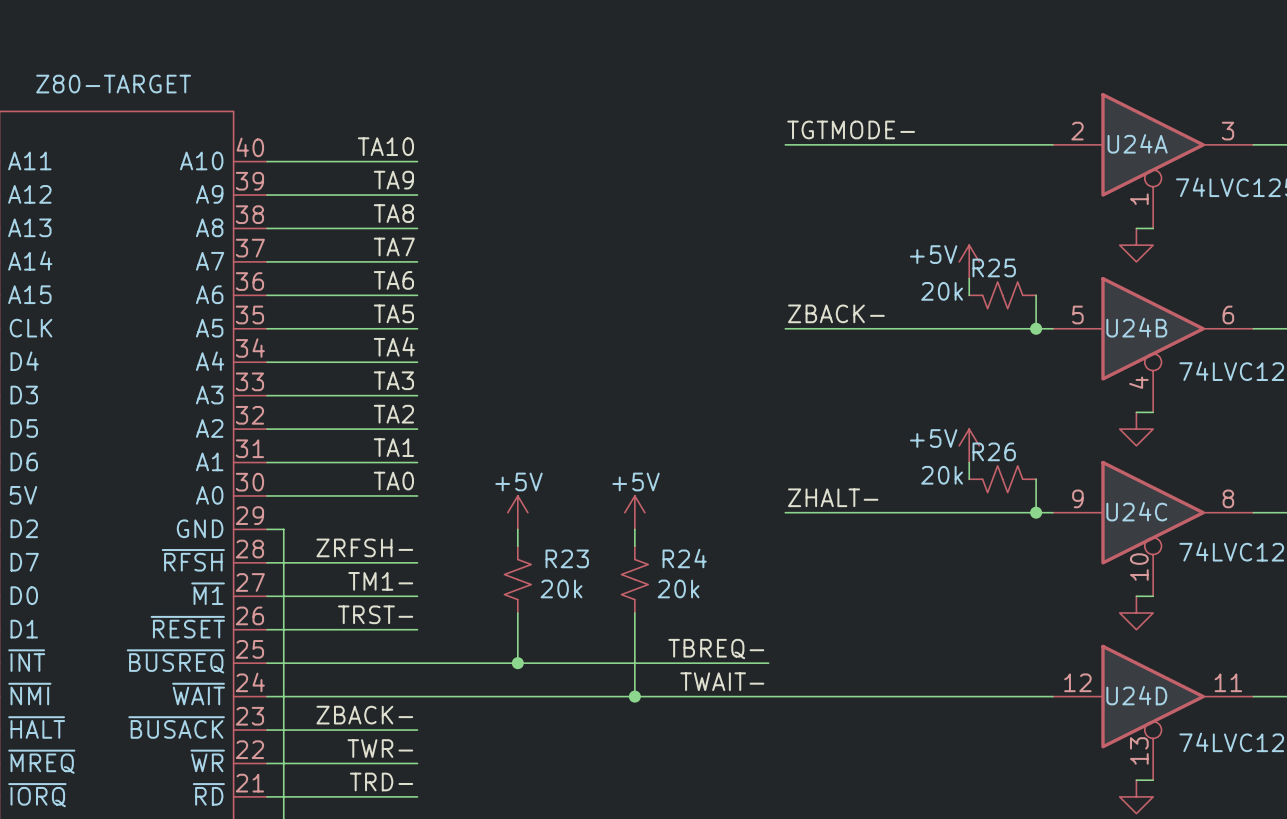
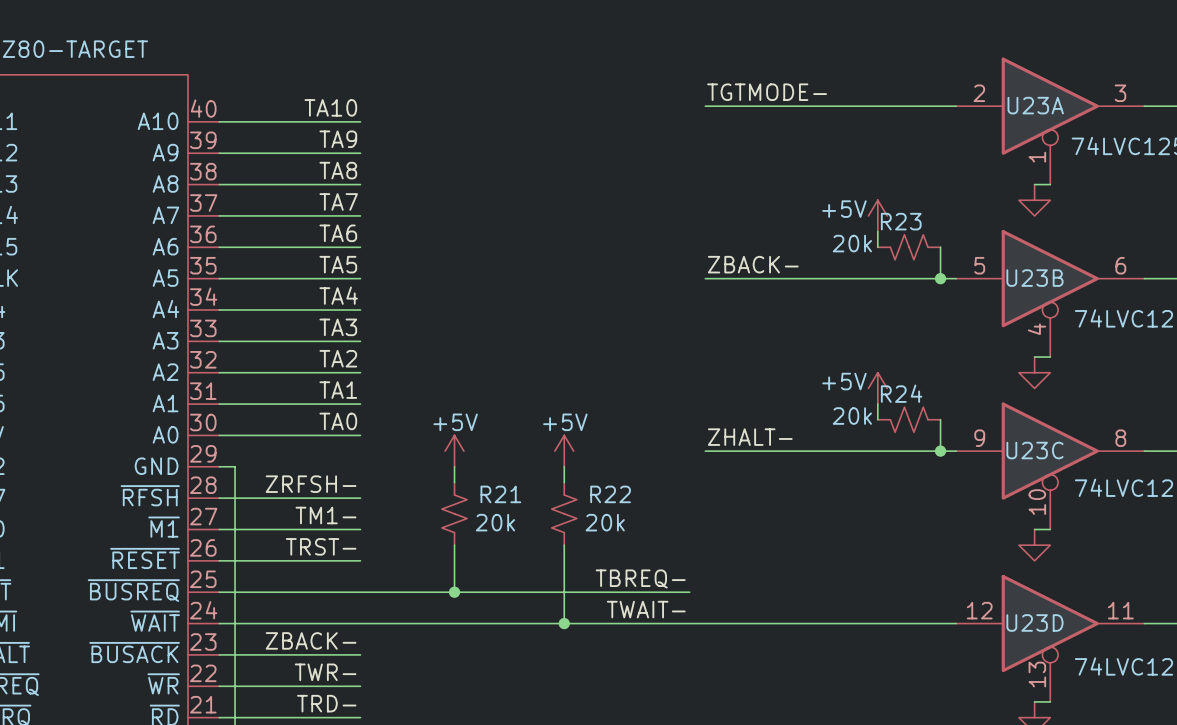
U24A name: U24A (1137, 143) -> U23A (1035, 105)
R25 name: R25 (994, 267) -> R23 (901, 221)
U24B name: U24B (1136, 327) -> U23B (1034, 278)
R26 name: R26 (994, 451) -> R24 (901, 393)
U24C name: U24C (1136, 511) -> U23C (1034, 450)
R23 name: R23 (567, 558) -> R21 (500, 494)
R24 name: R24 (684, 558) -> R22 (610, 494)
U24D name: U24D (1136, 695) -> U23D (1034, 622)

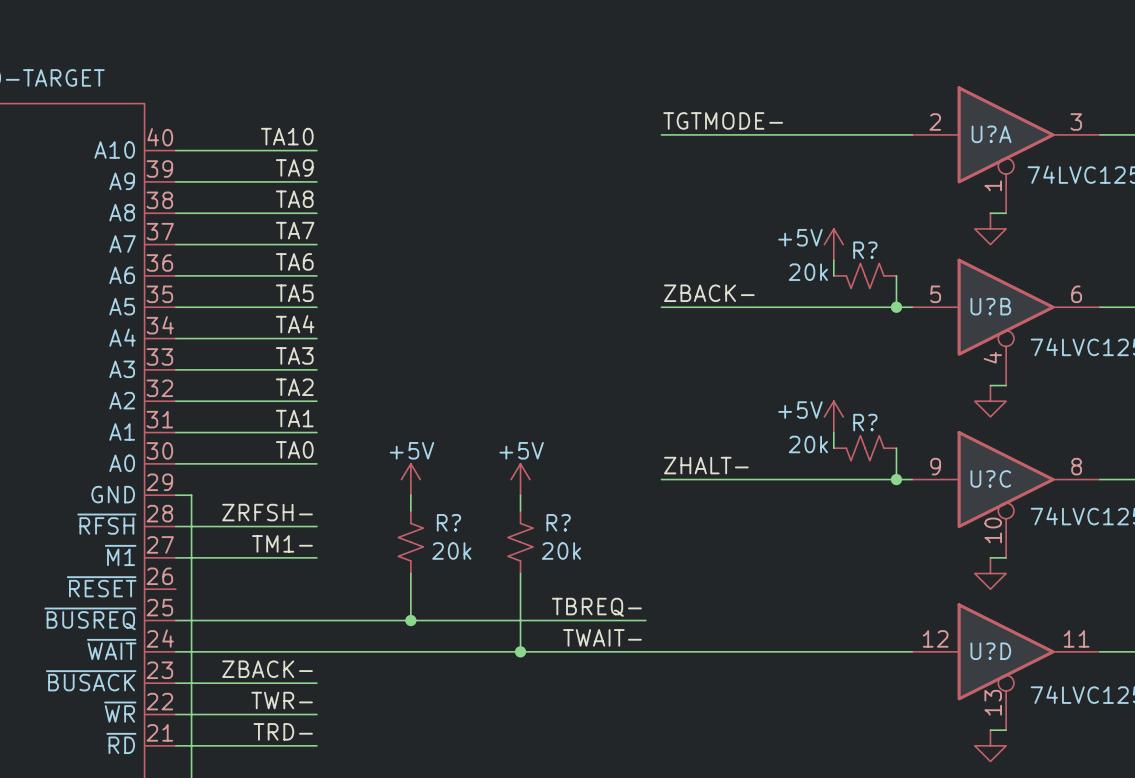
U23A name: U23A (1035, 105) -> U?A (991, 134)
R23 name: R23 (901, 221) -> R? (865, 250)
U23B name: U23B (1034, 278) -> U?B (990, 306)
R24 name: R24 (901, 393) -> R? (865, 422)
U23C name: U23C (1034, 450) -> U?C (990, 478)
R21 name: R21 (500, 494) -> R? (448, 522)
R22 name: R22 (610, 494) -> R? (558, 522)
label: TRST- (321, 546) -> none
wire: (219, 560) (360, 560) -> none
U23D name: U23D (1034, 622) -> U?D (990, 651)

